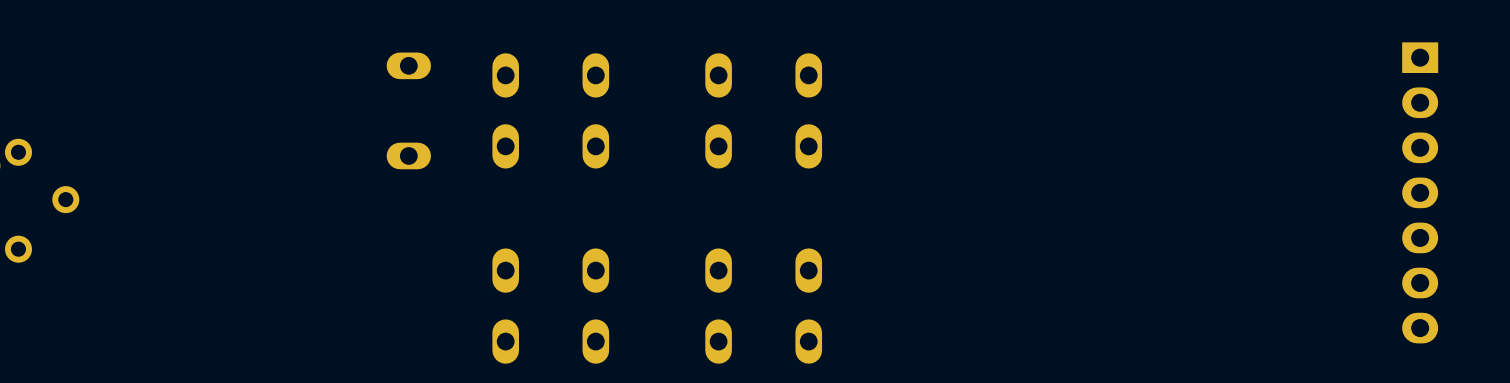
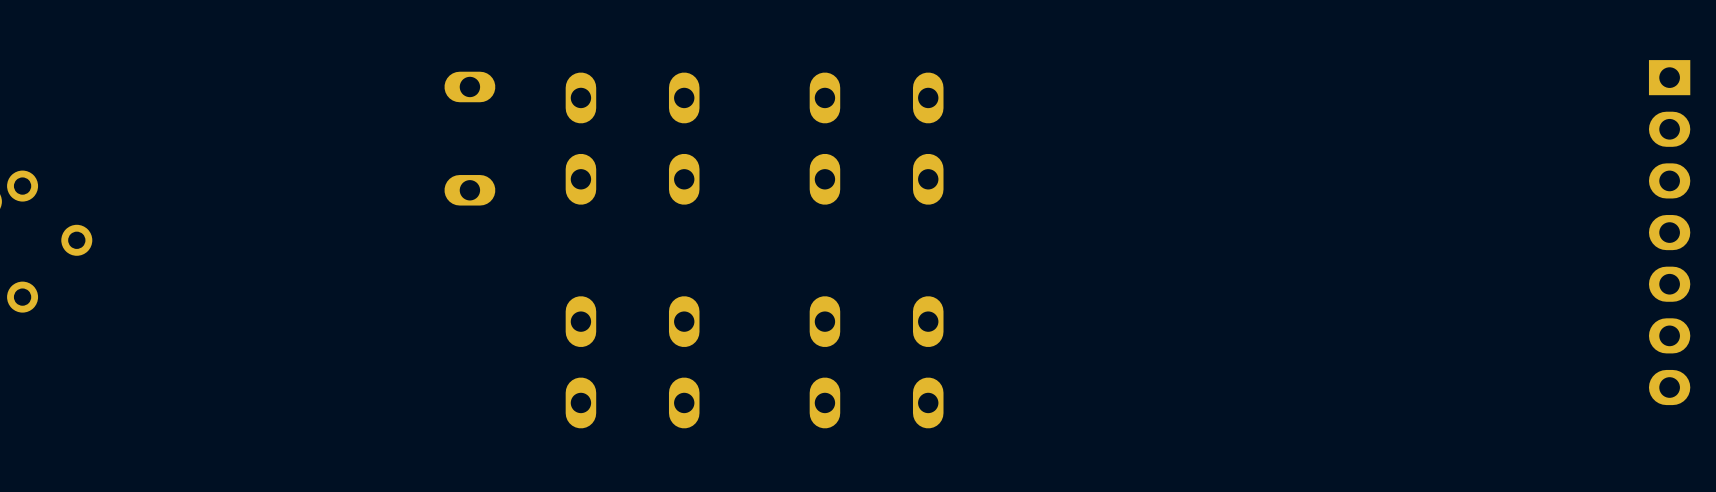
part position: (1420, 192) -> (1669, 232)

